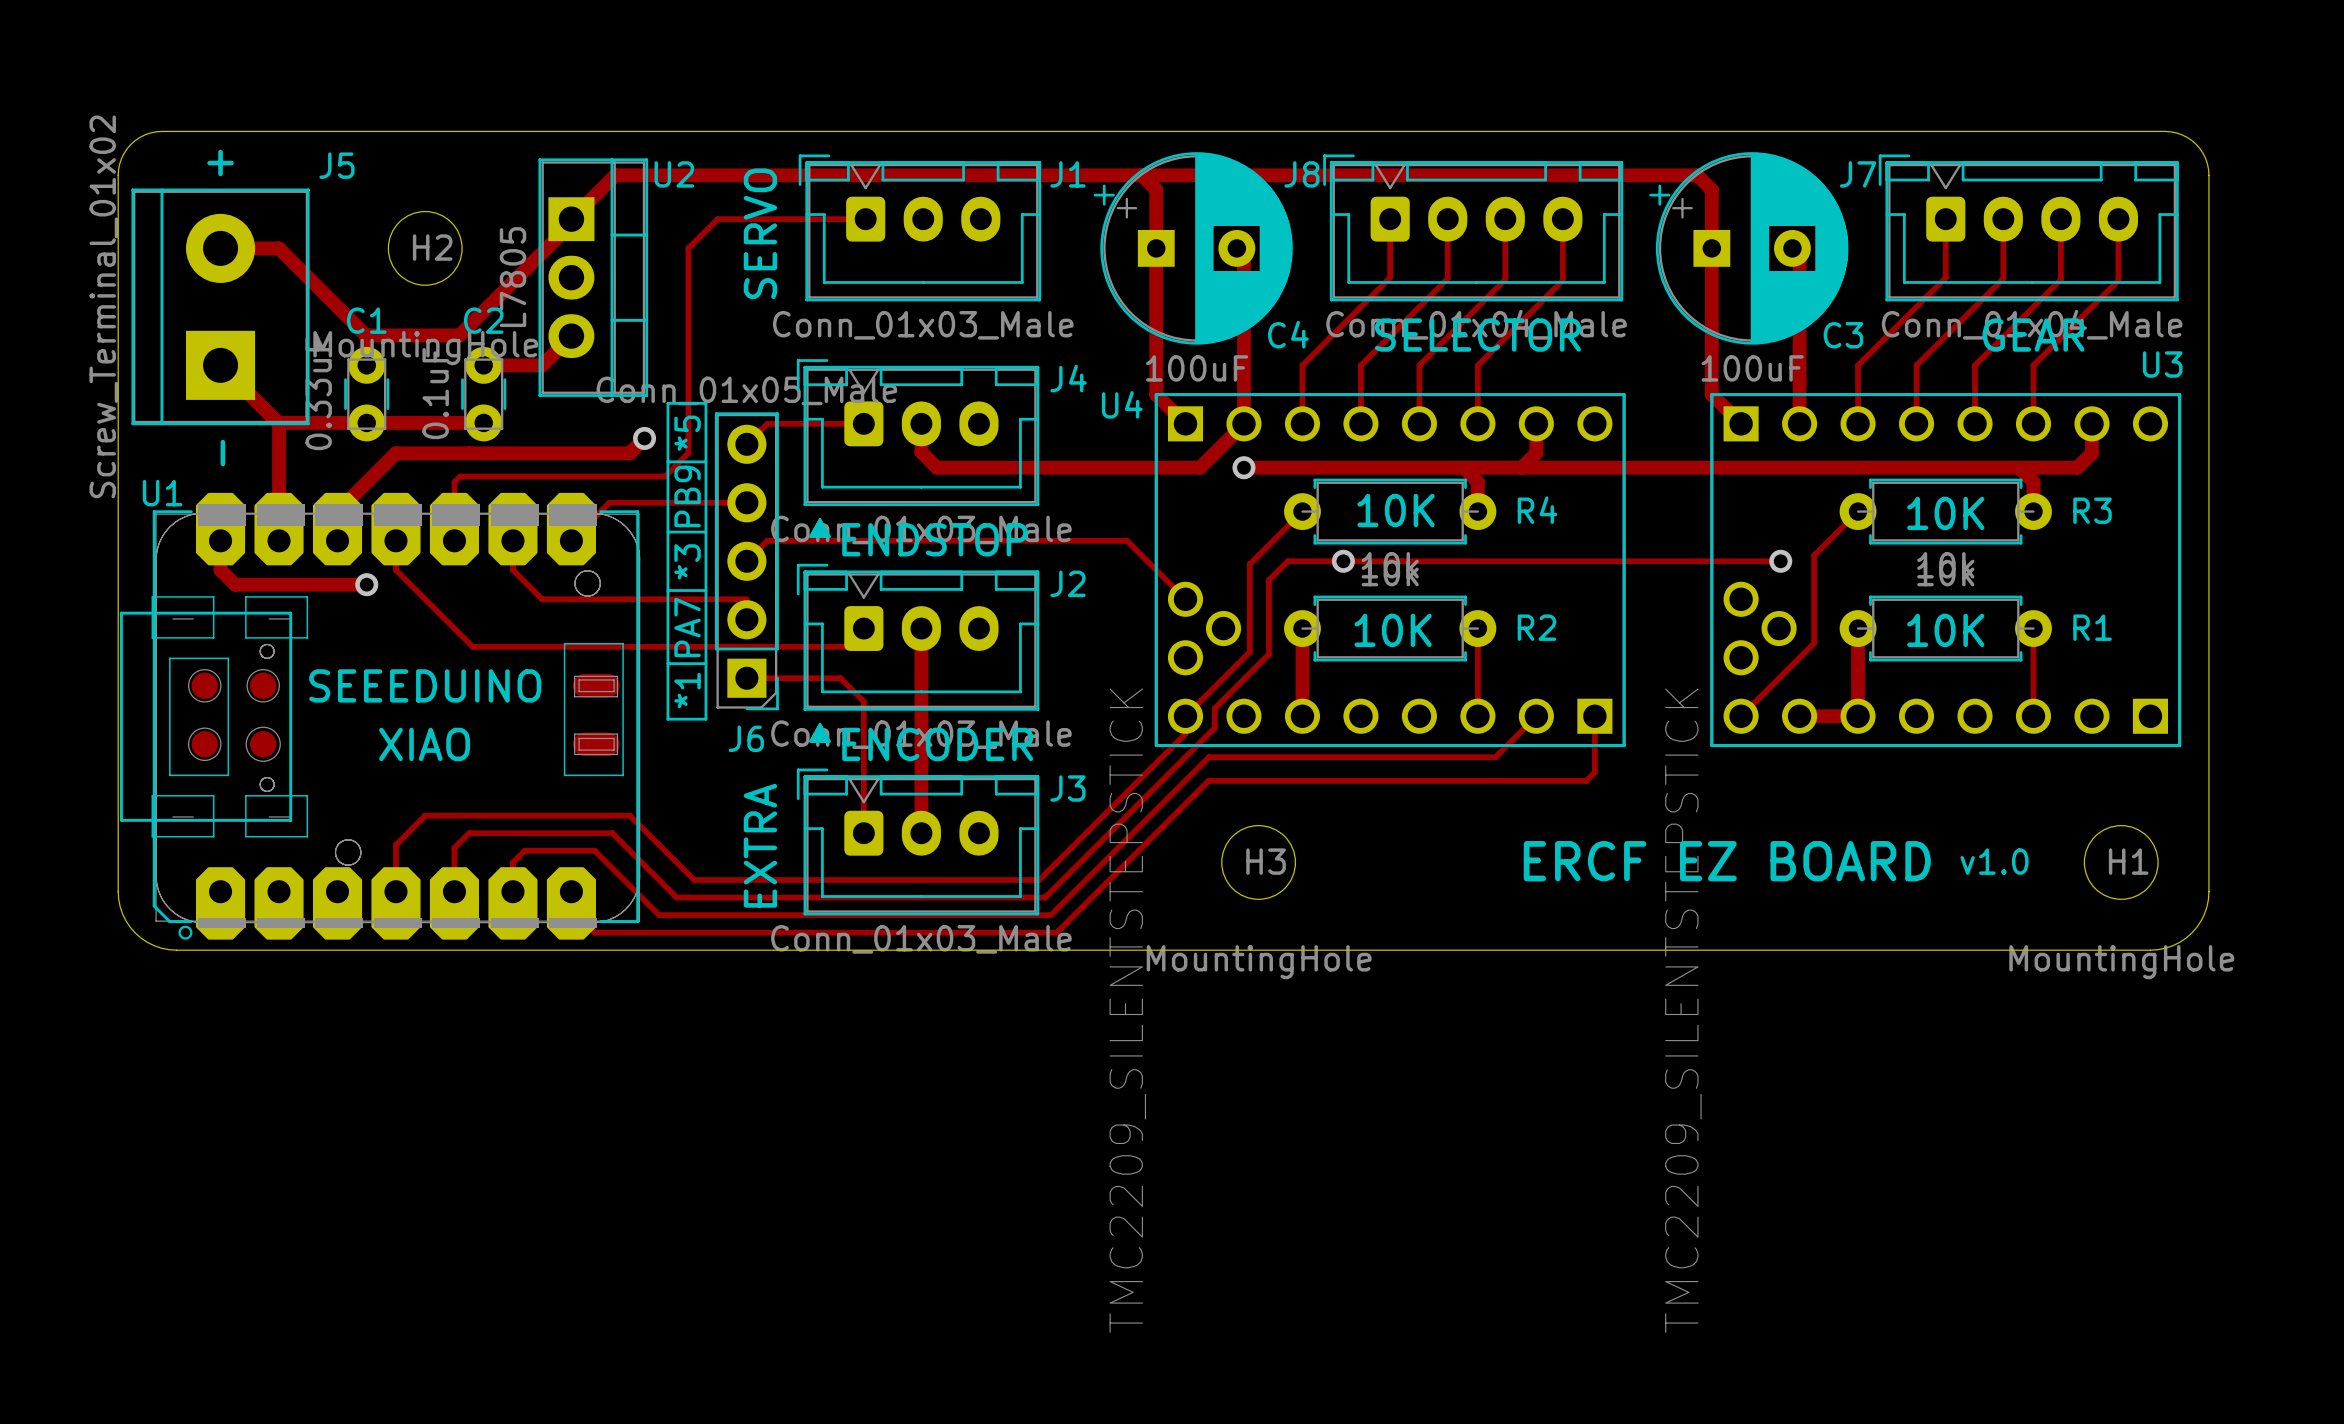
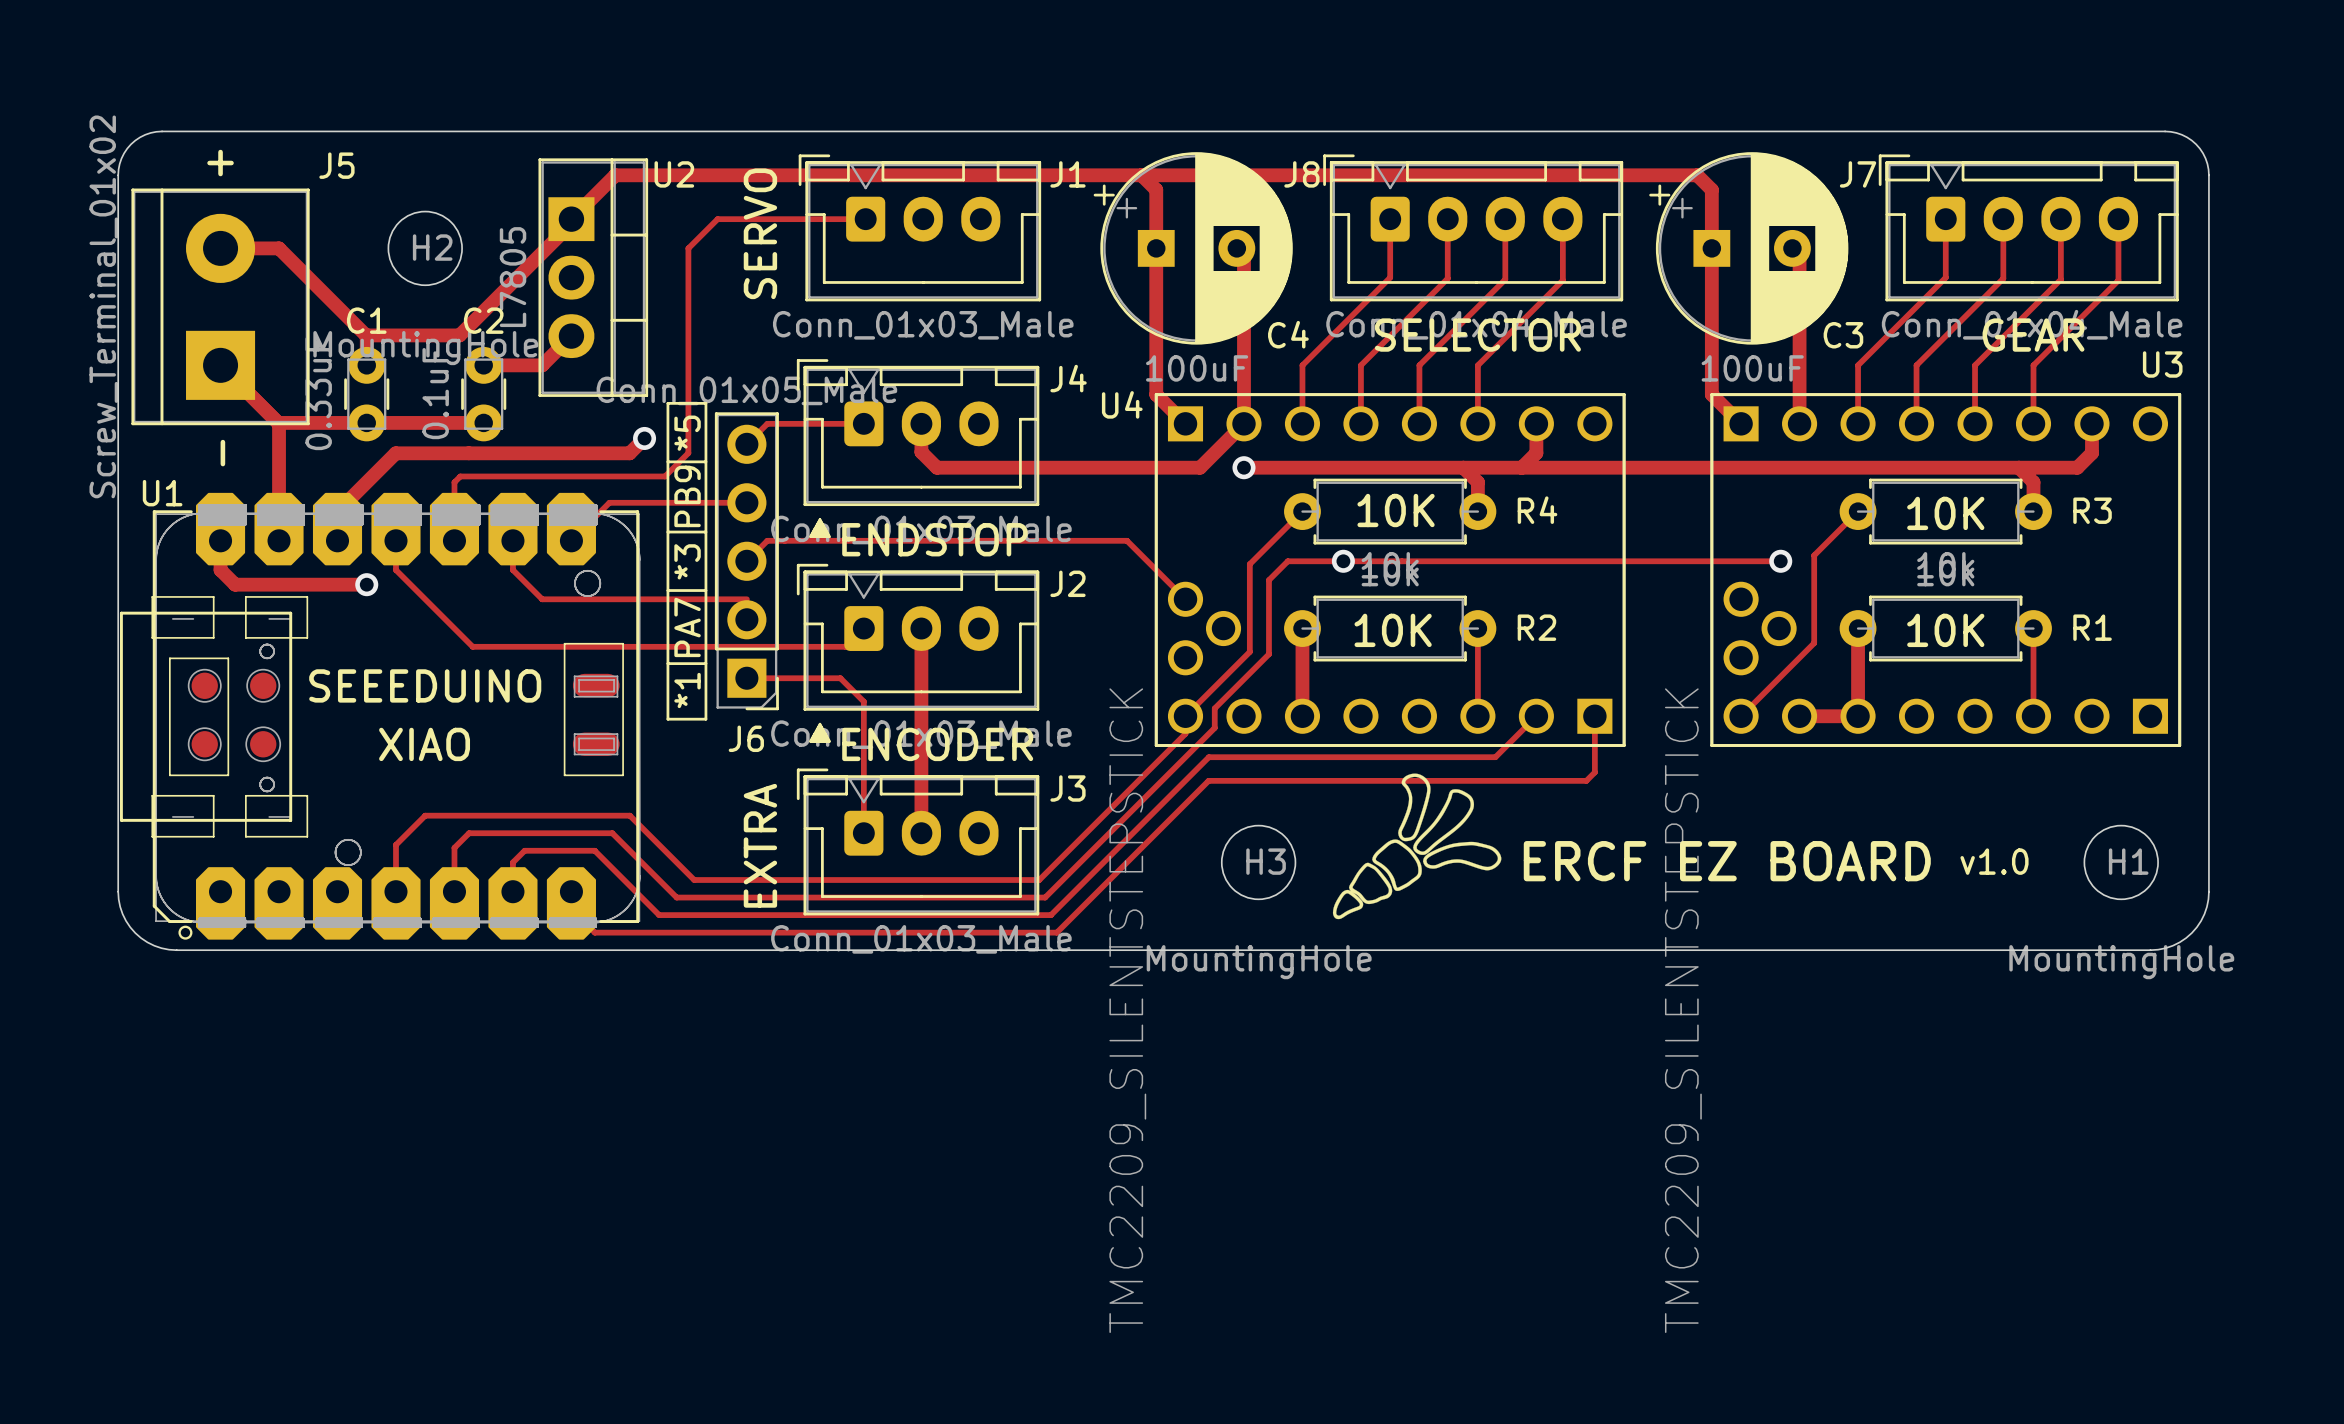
drawing: none -> [1332, 773, 1502, 920]

